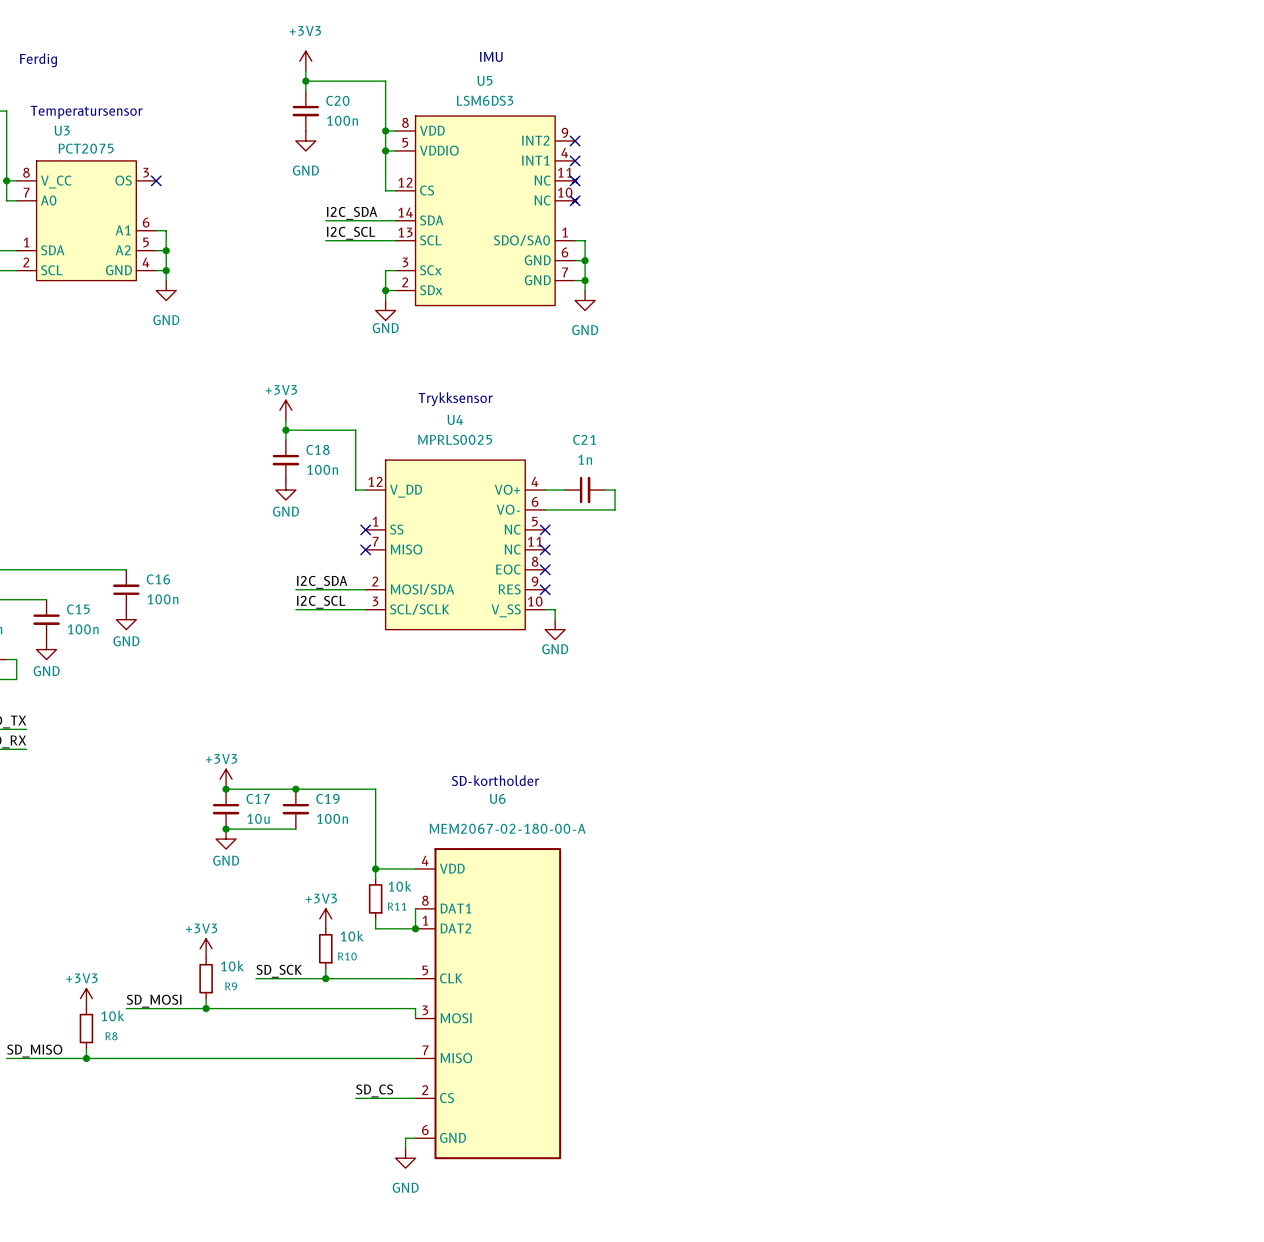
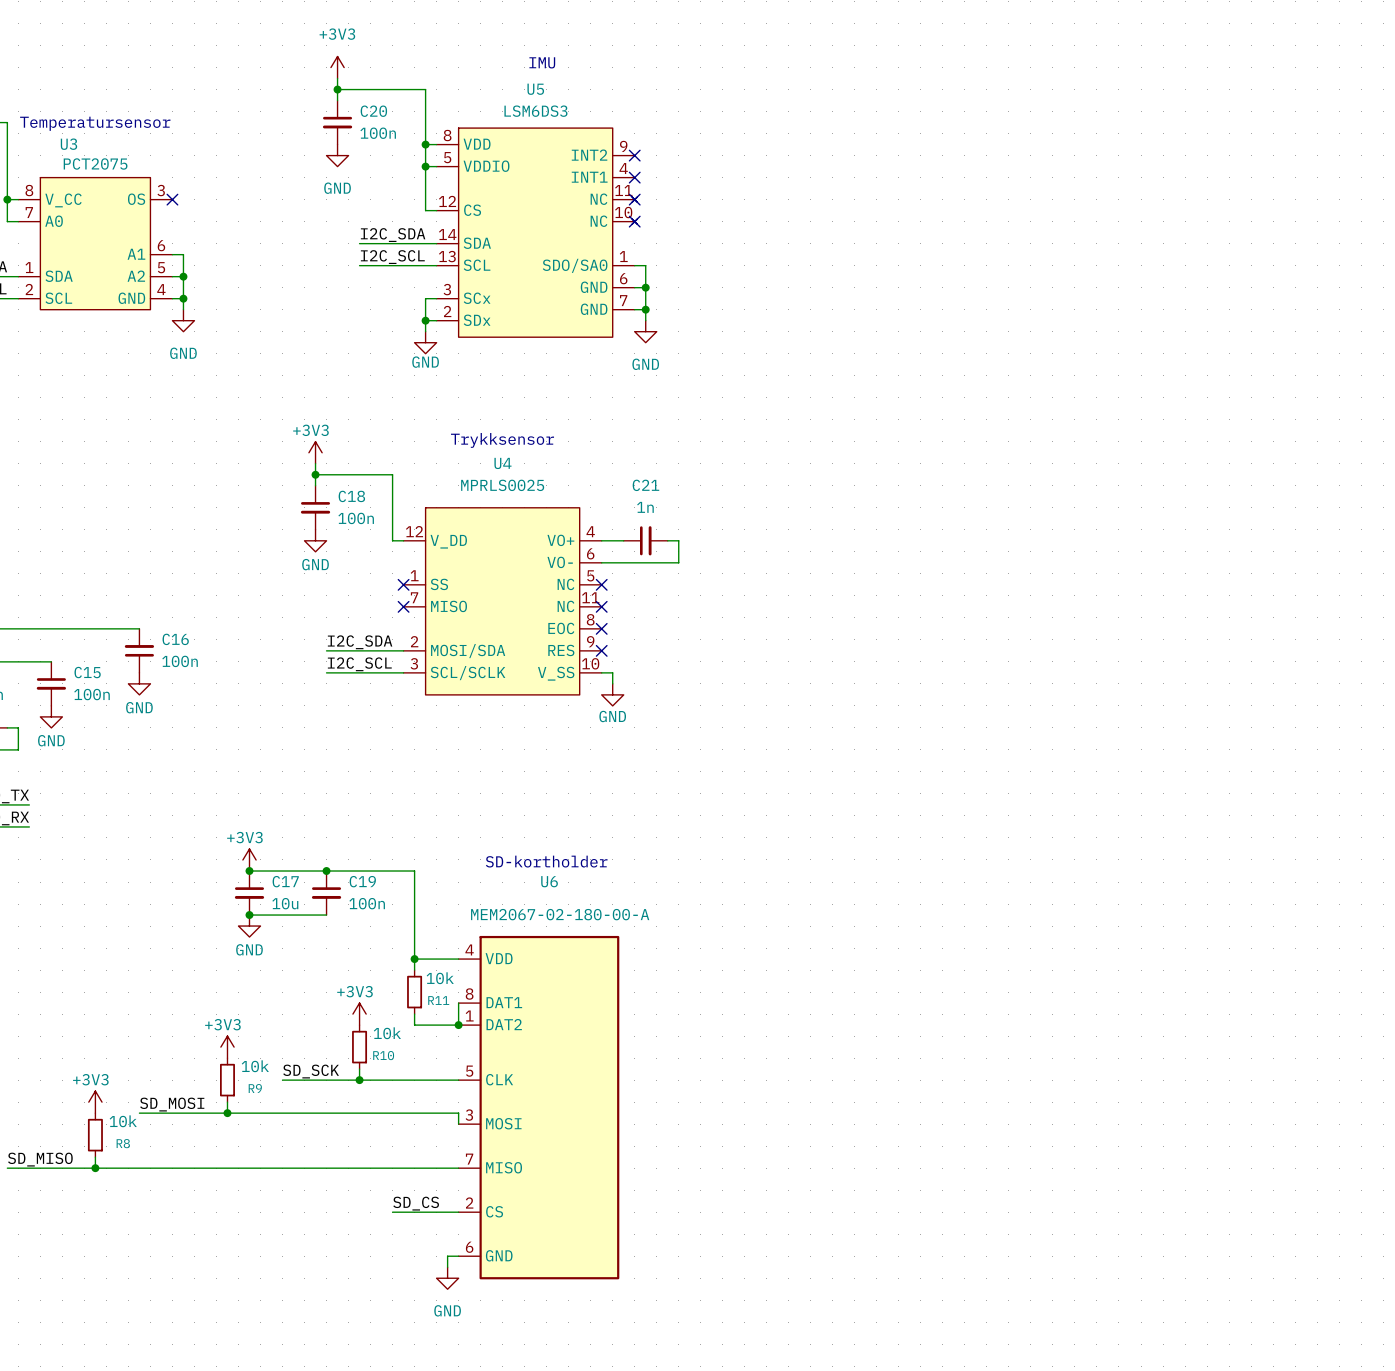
text: Ferdig (38, 60) -> none

